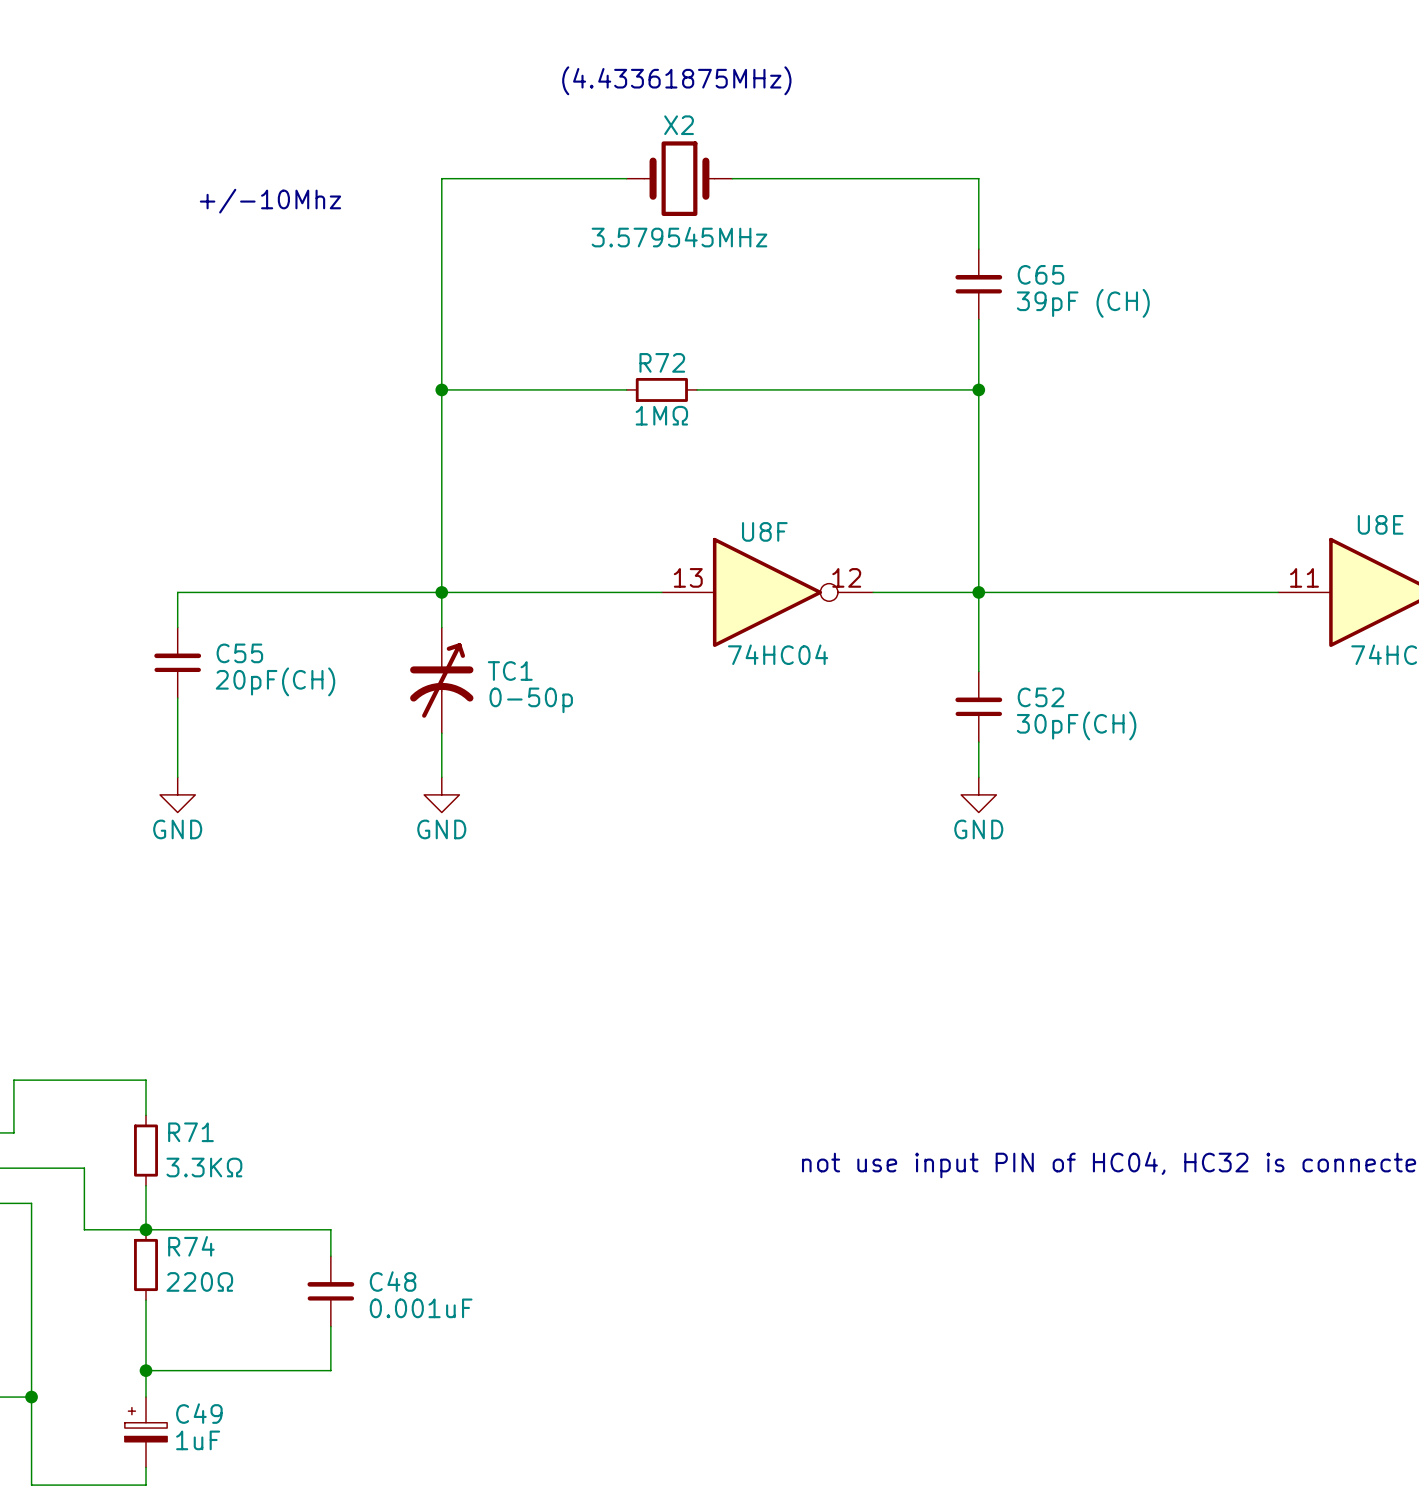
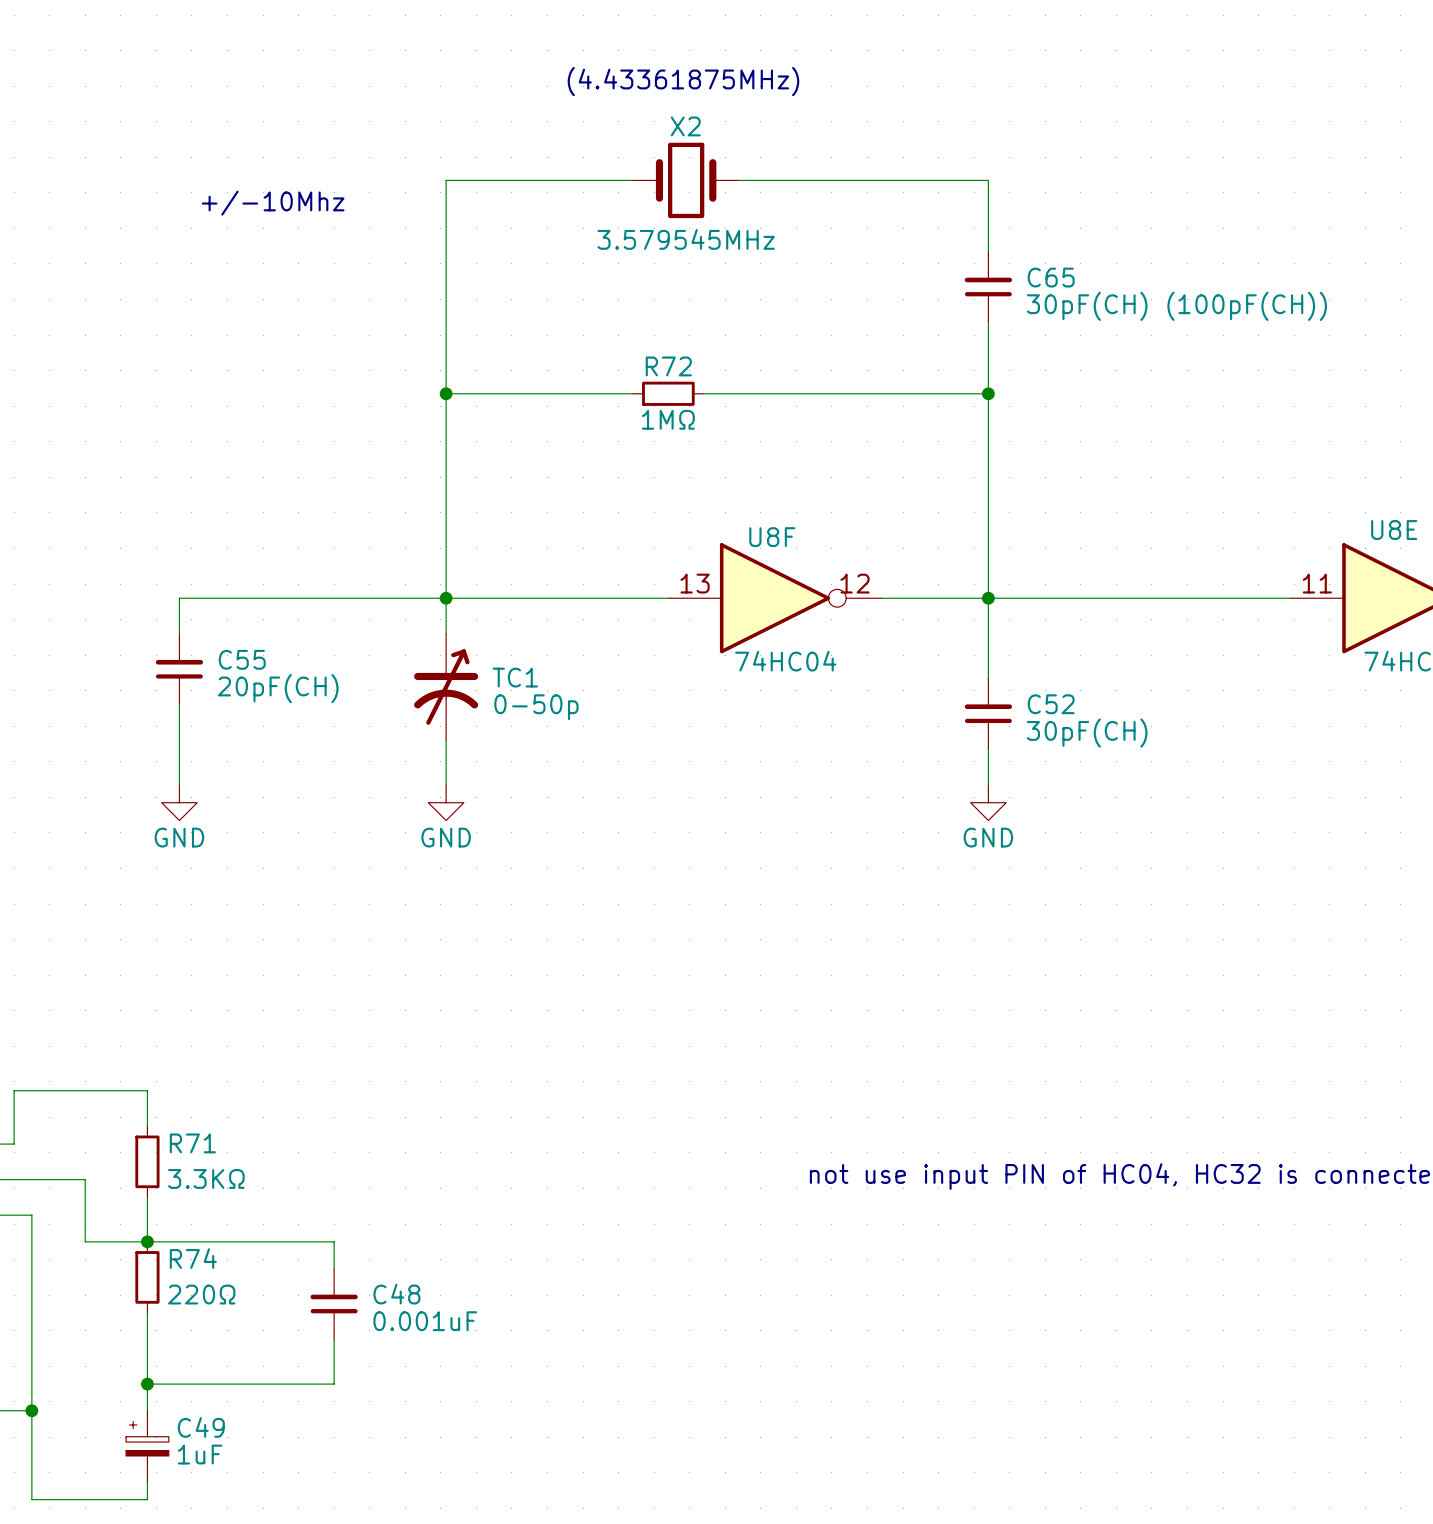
C65 value: 39pF (CH) (1083, 303) -> 30pF(CH) (100pF(CH)) (1176, 306)

